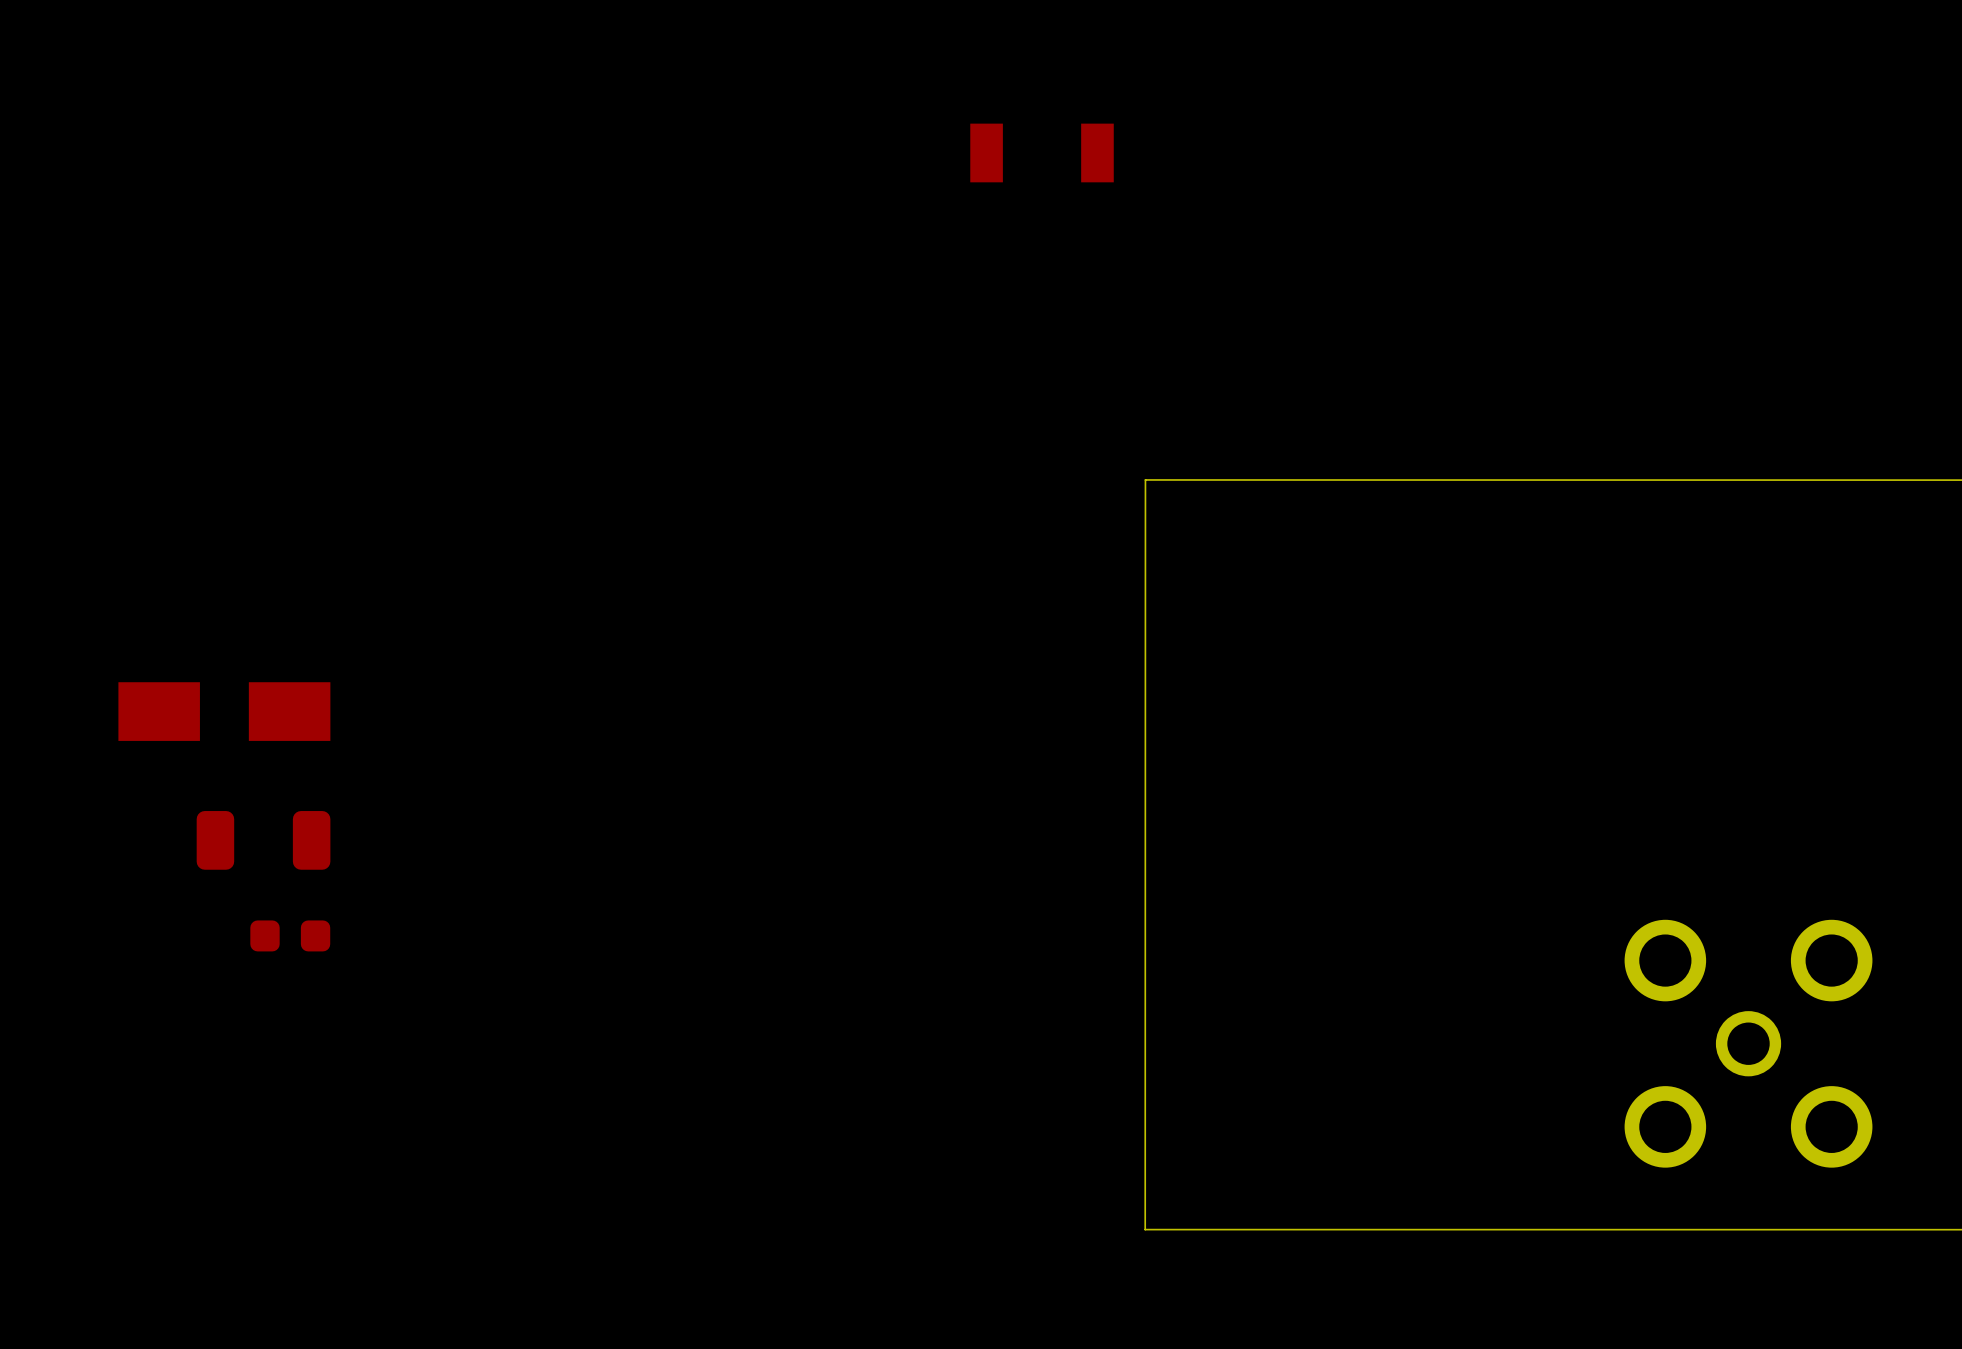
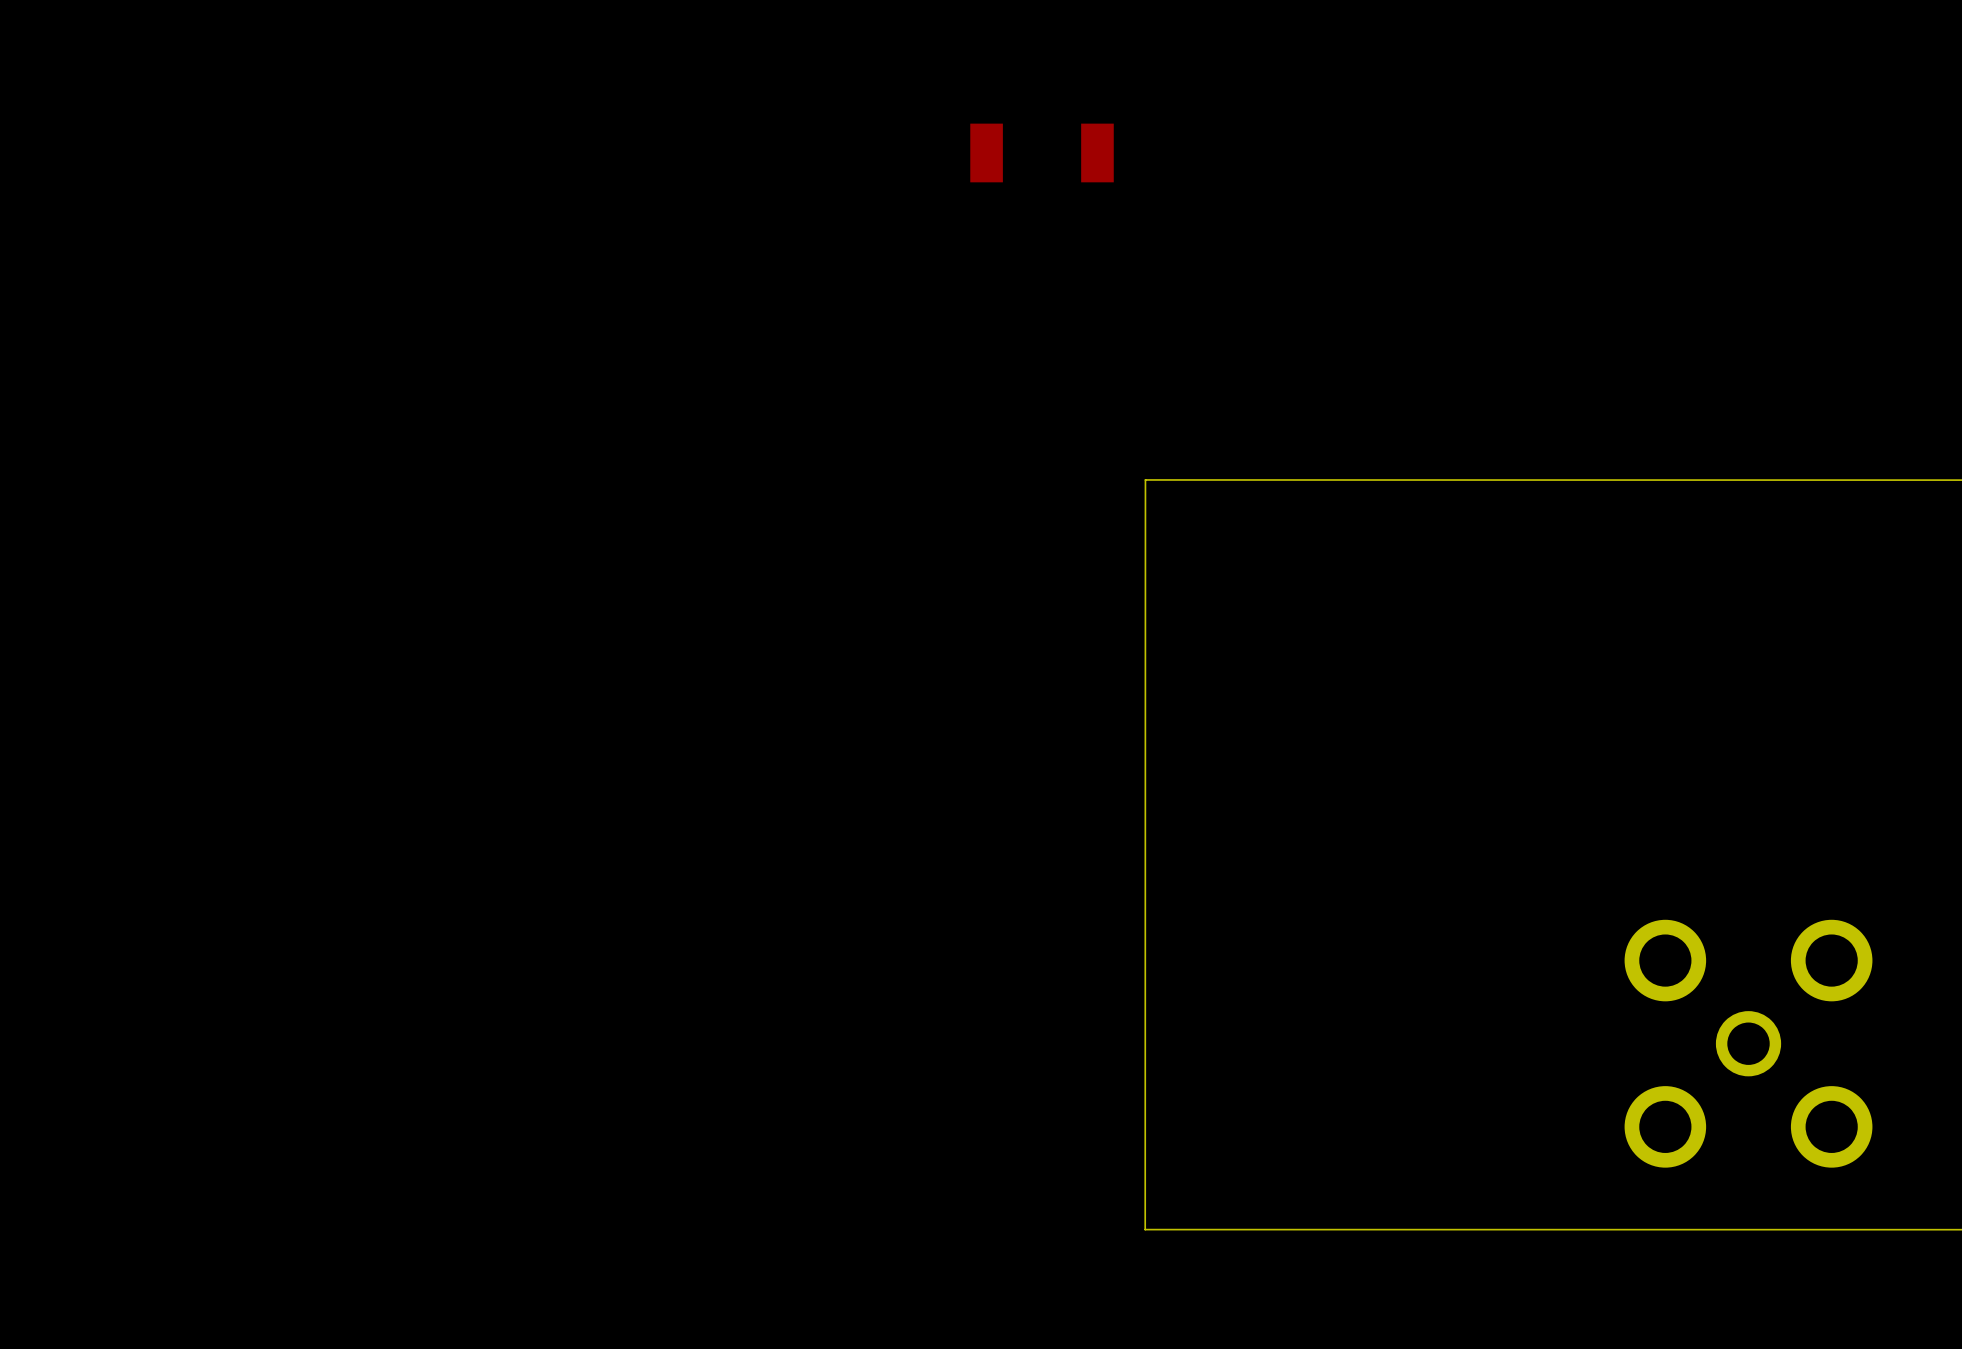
part: (224, 711) -> none
part: (263, 840) -> none
part: (290, 935) -> none

